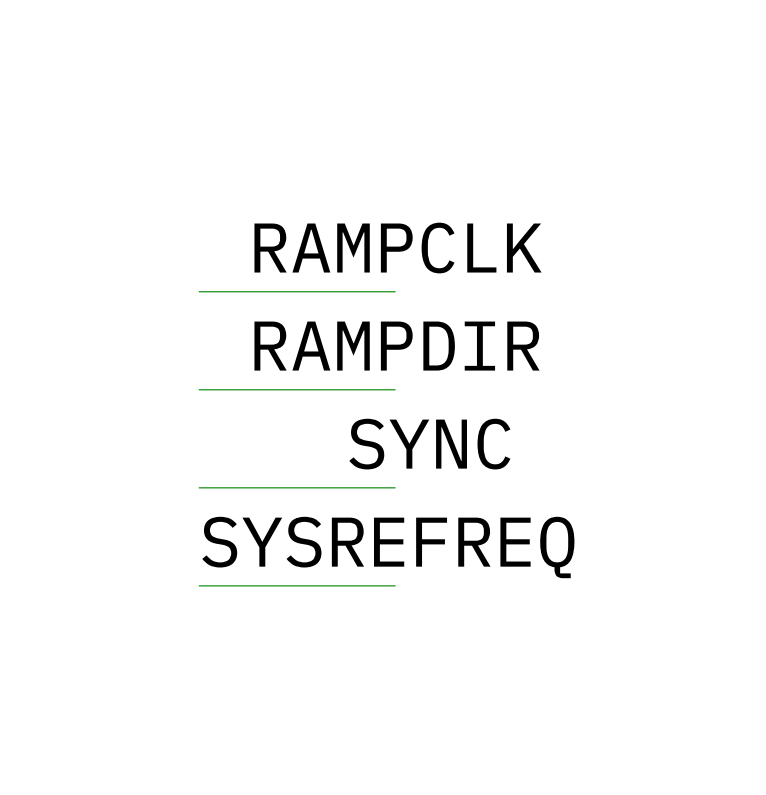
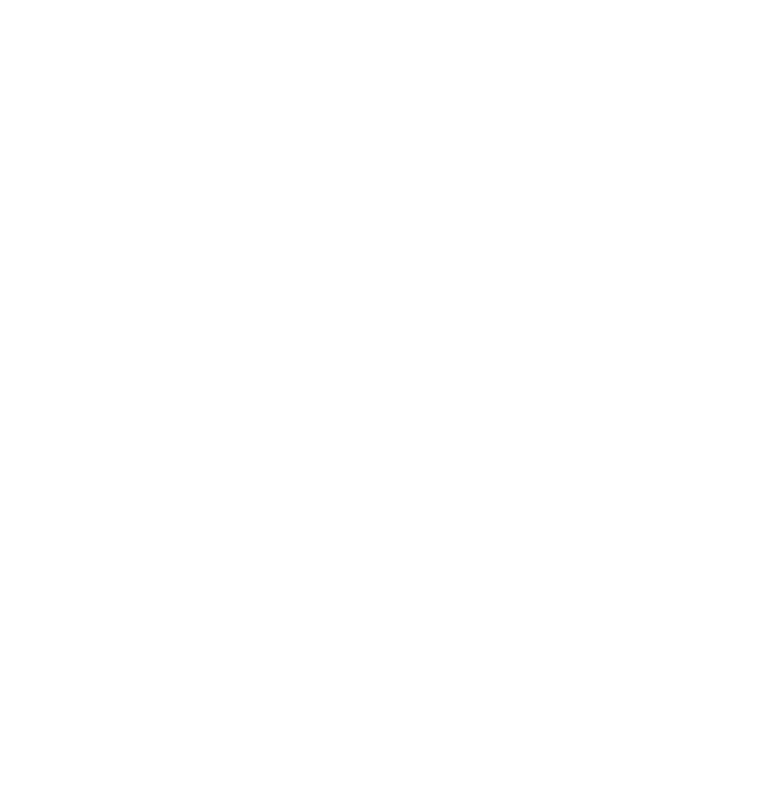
label: RAMPCLK (398, 248) -> none
wire: (199, 291) (395, 291) -> none
label: RAMPDIR (397, 346) -> none
wire: (199, 389) (395, 389) -> none
label: SYNC (429, 444) -> none
wire: (199, 487) (395, 487) -> none
label: SYSREFREQ (388, 547) -> none
wire: (199, 585) (395, 585) -> none

